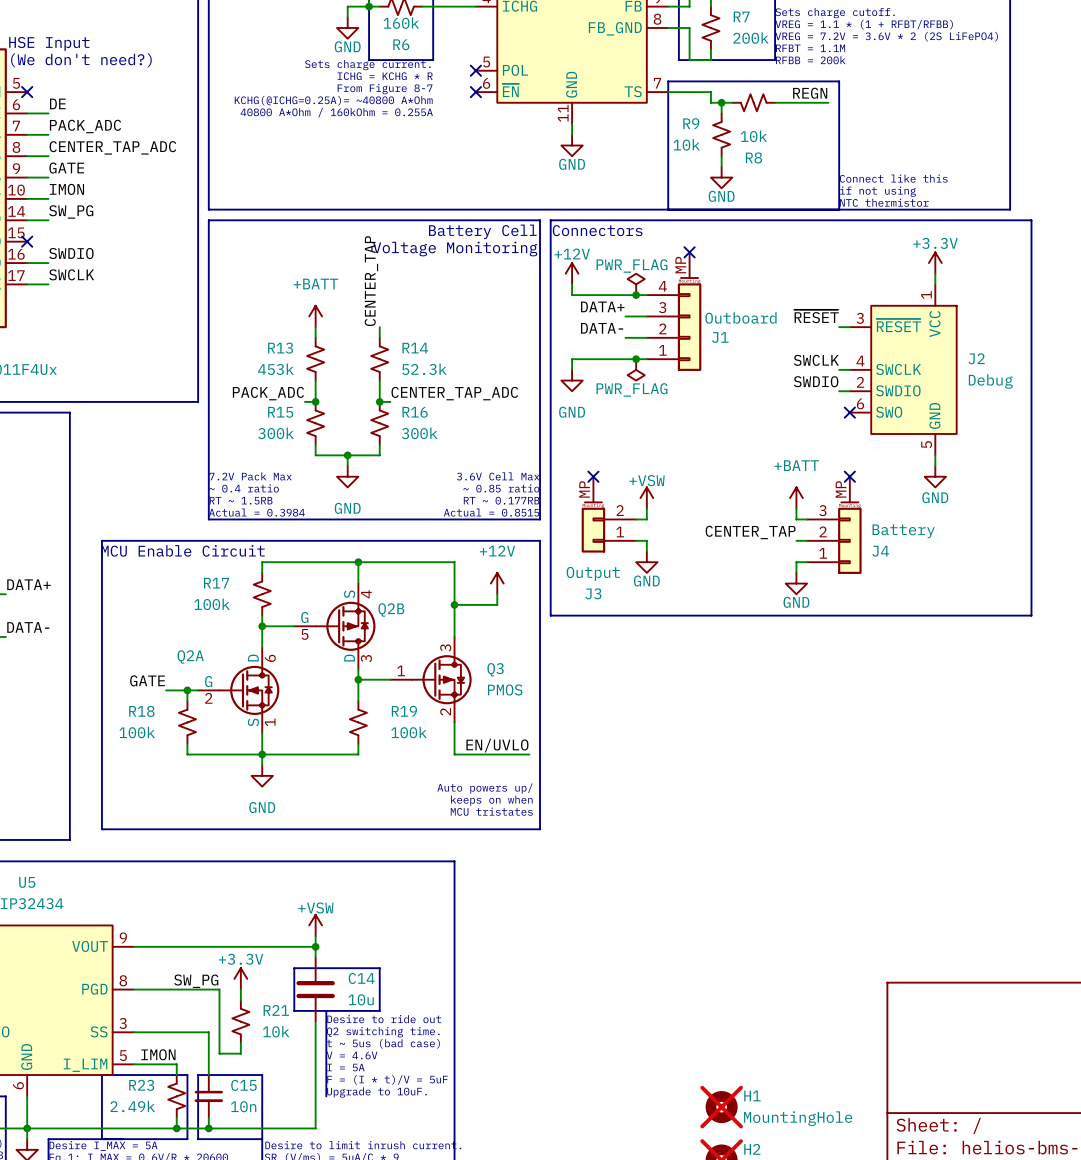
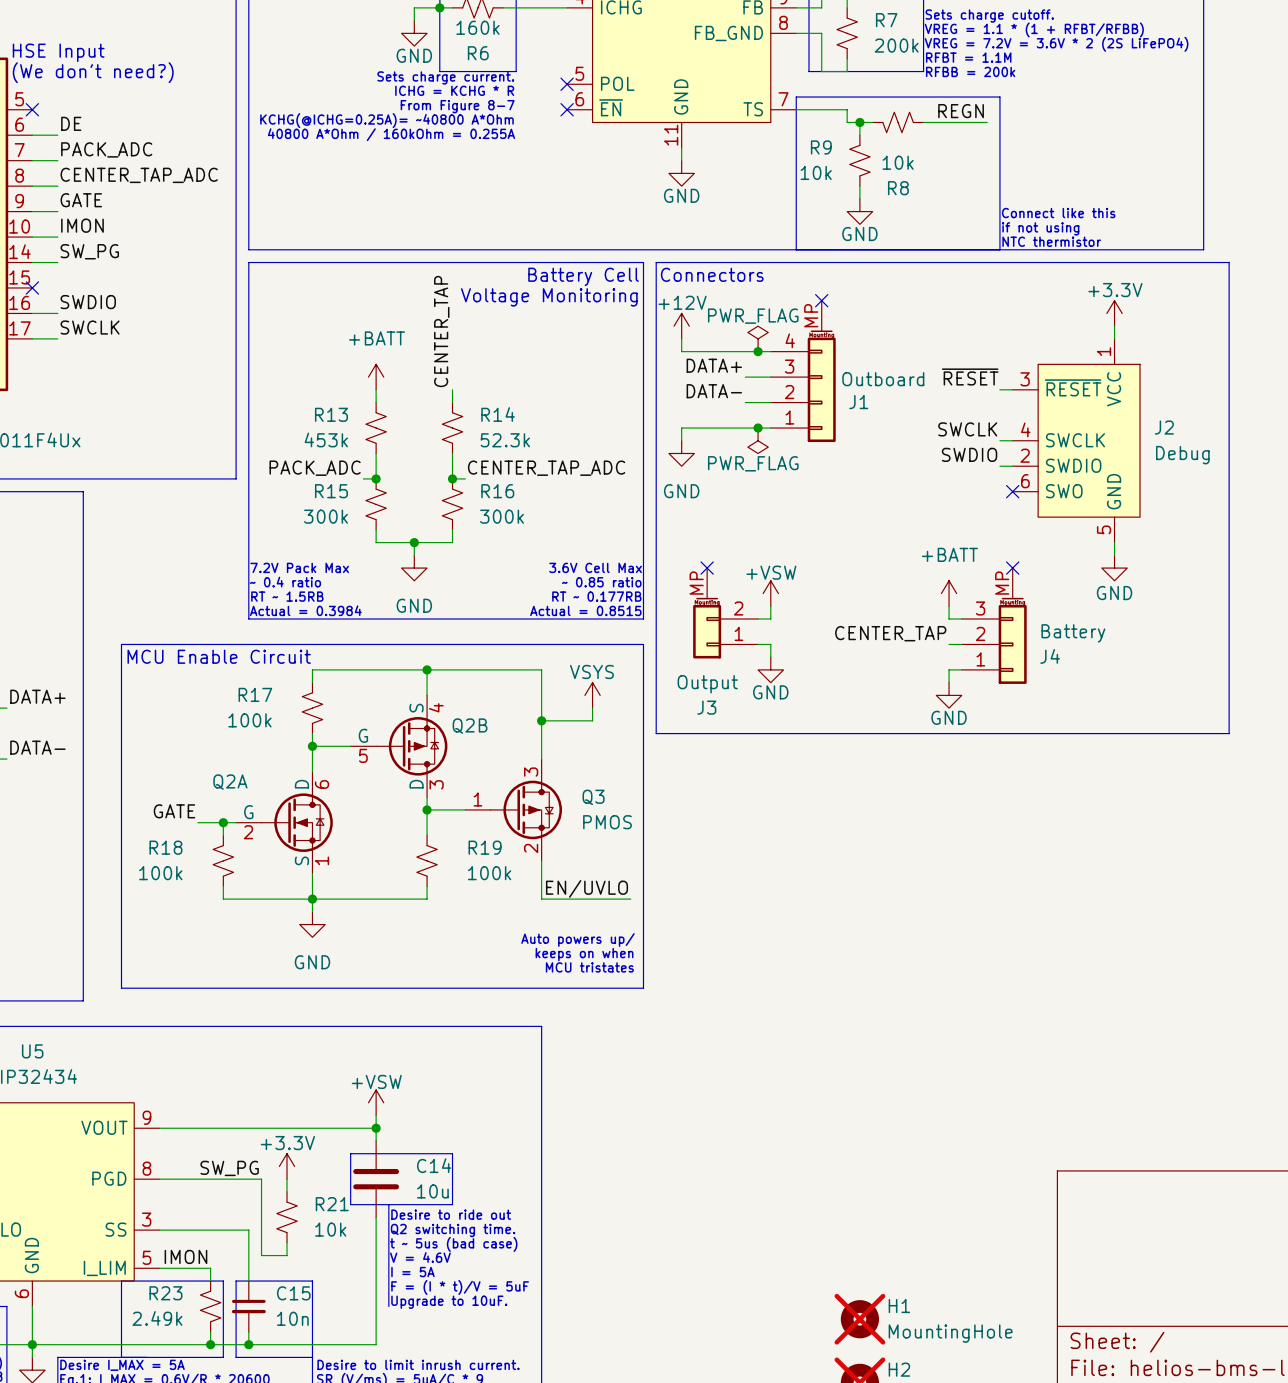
power symbol: +12V (497, 583) -> VSYS (592, 695)

